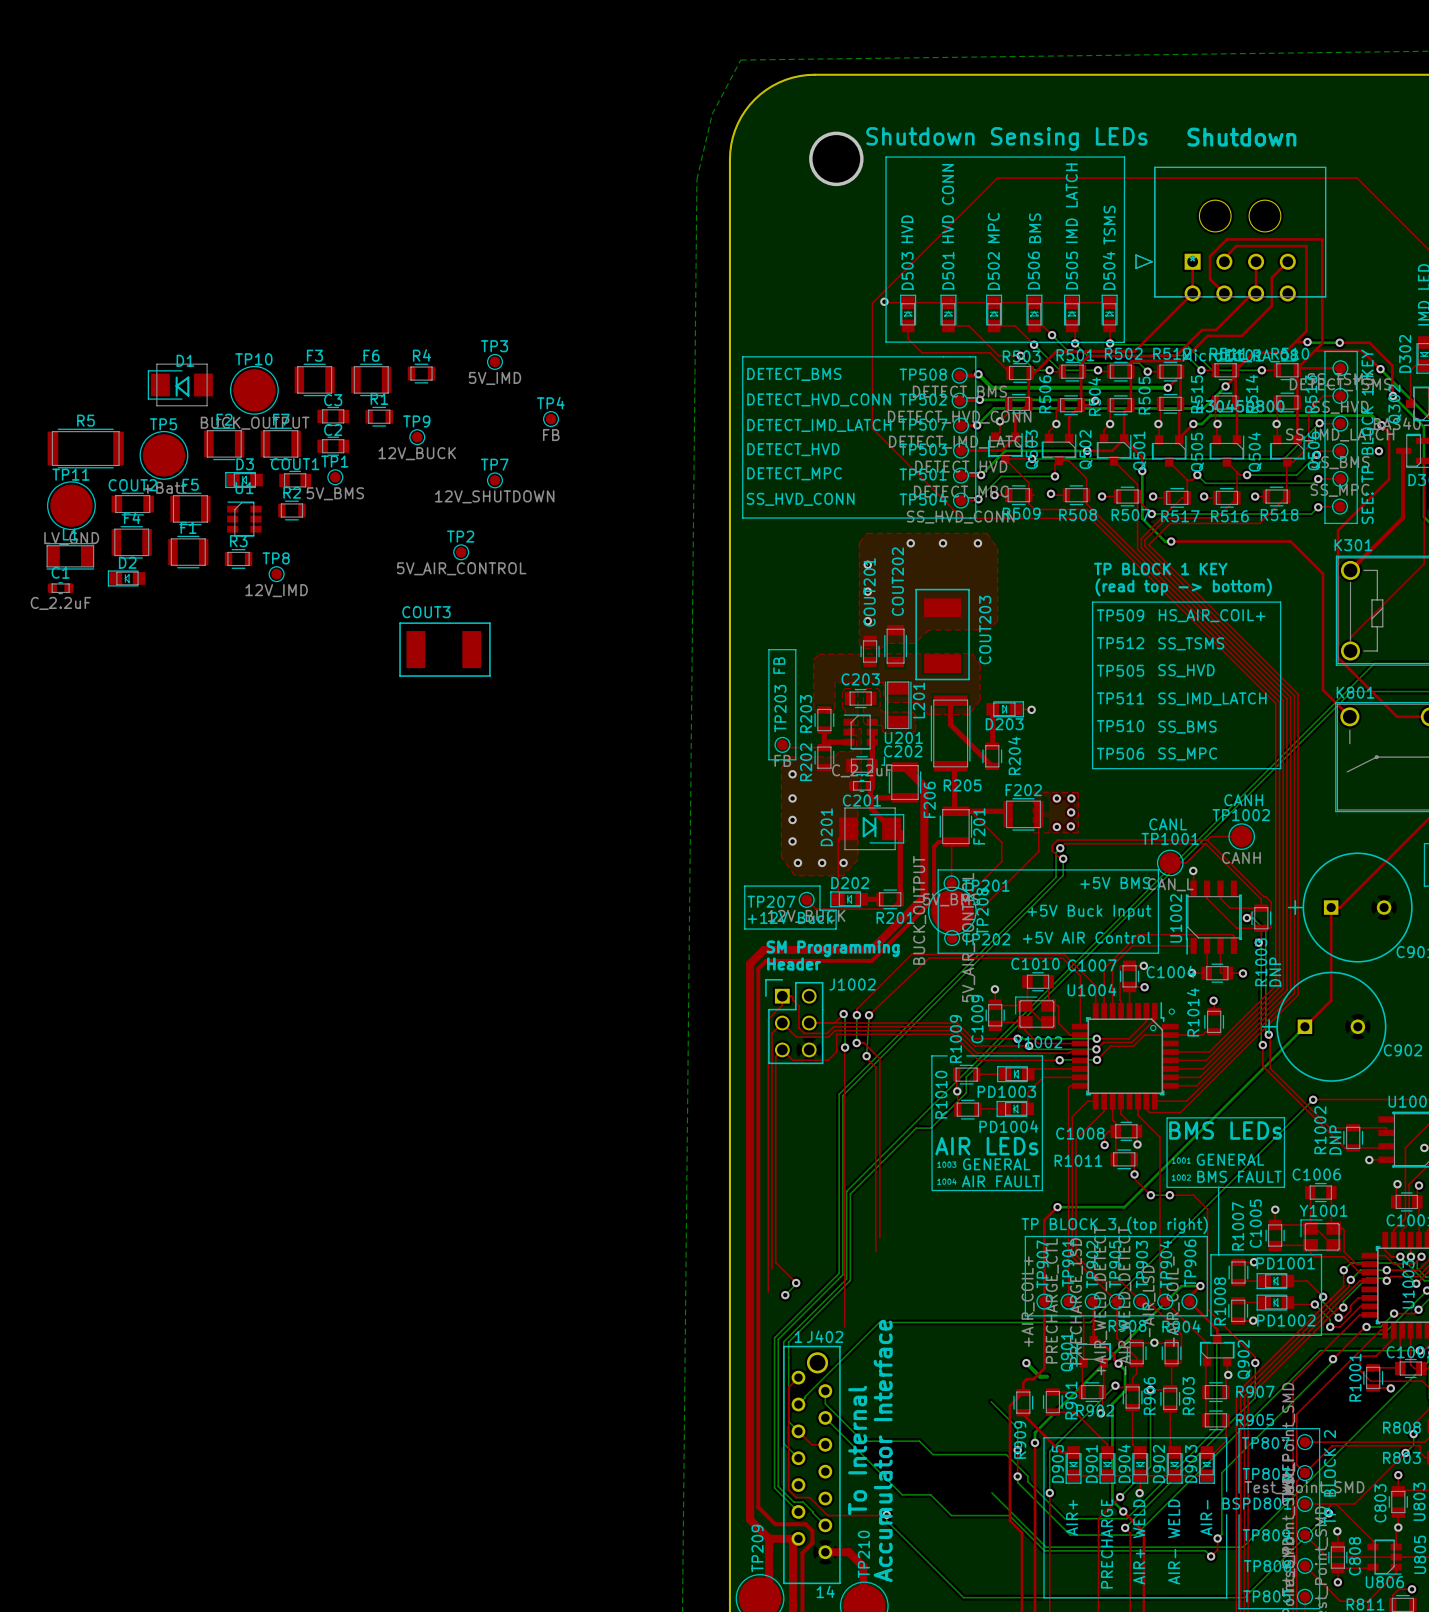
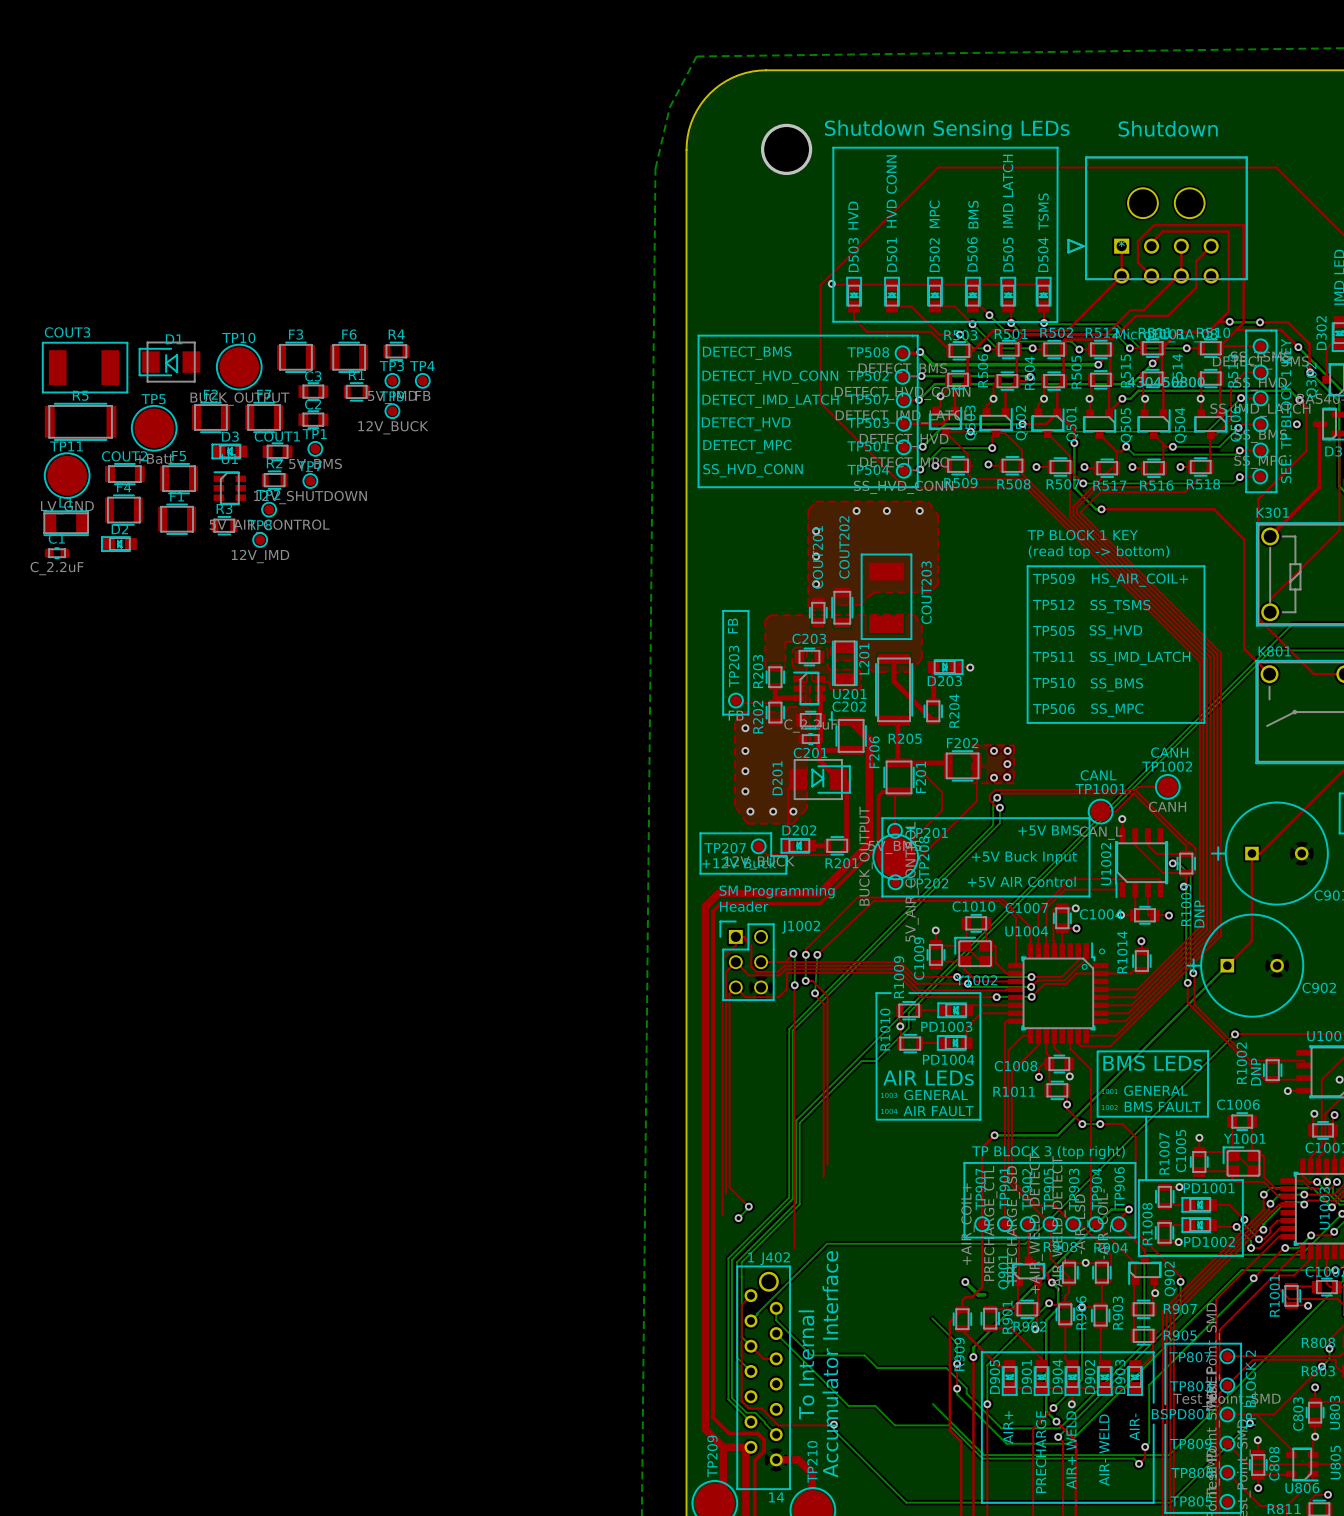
TP3 position: (494, 361) -> (392, 380)
TP4 position: (551, 419) -> (422, 380)
TP7 position: (494, 480) -> (310, 480)
TP2 position: (461, 552) -> (269, 509)
COUT3 position: (444, 649) -> (85, 367)

